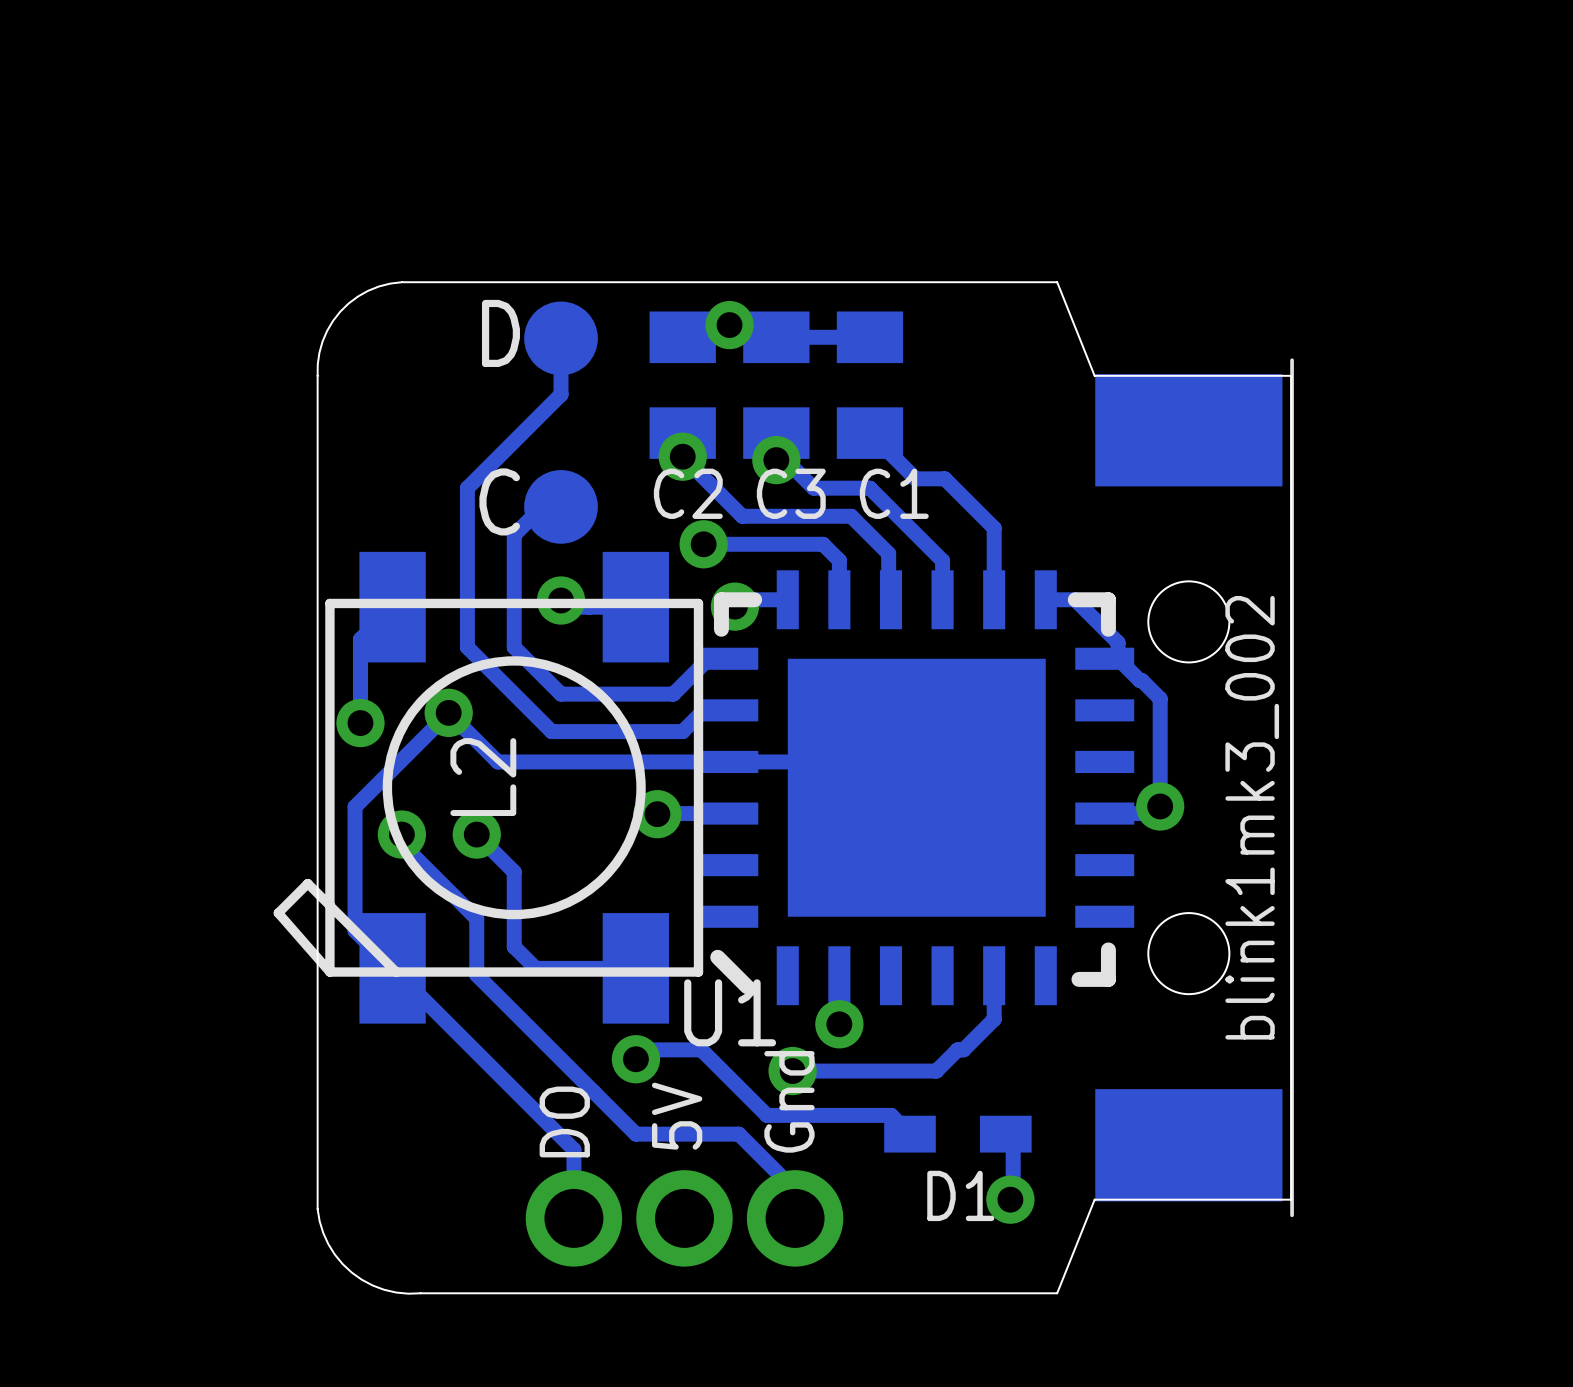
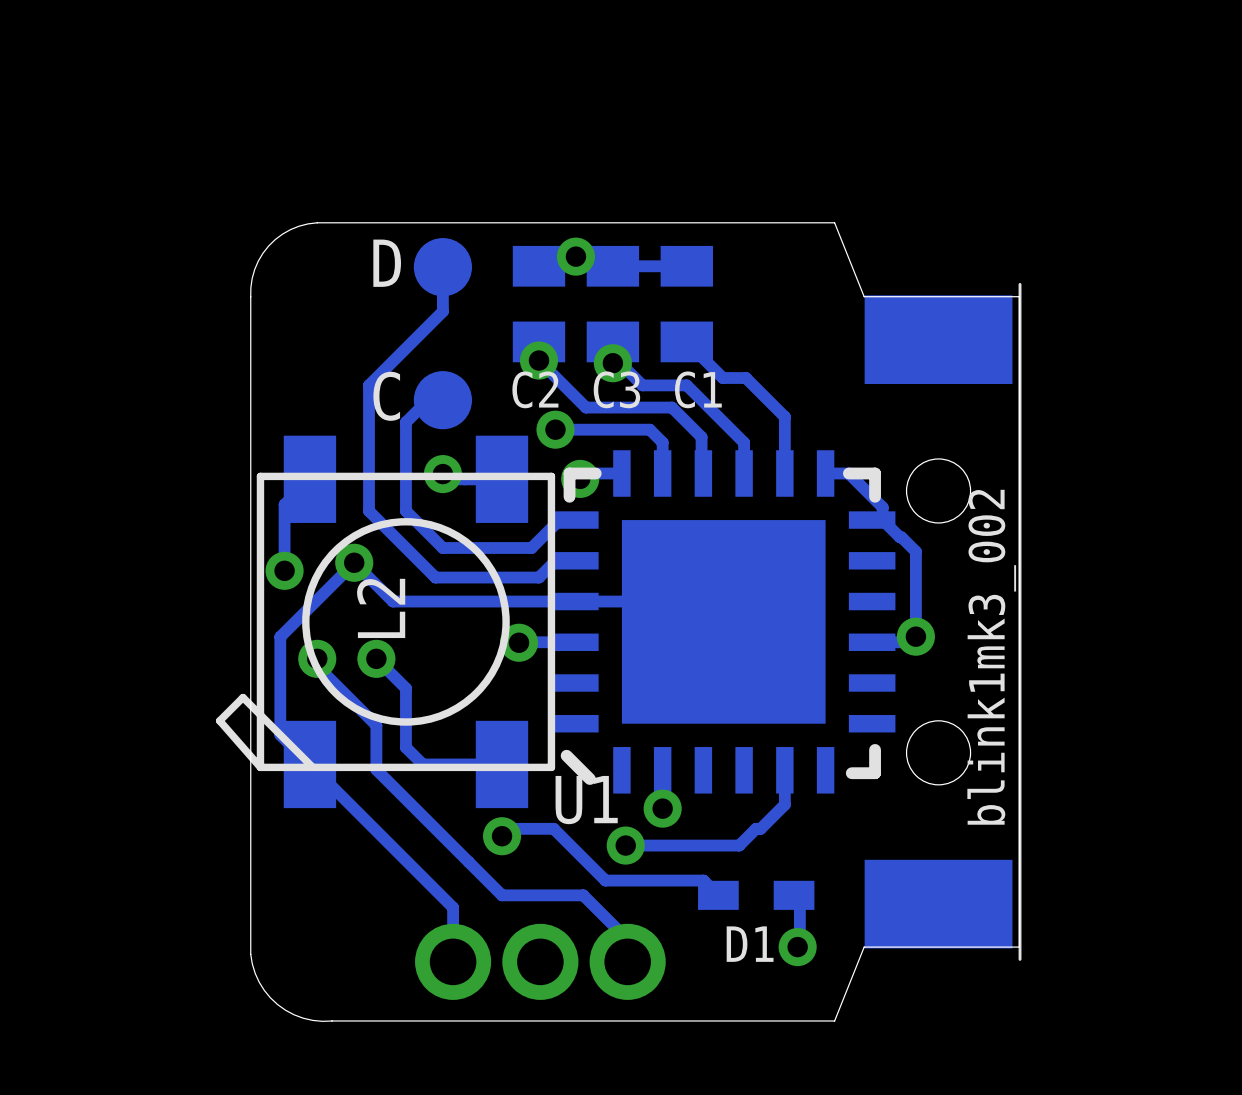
text: Gnd (789, 1101) -> none
text: 5V (677, 1116) -> none
text: DO (564, 1121) -> none

